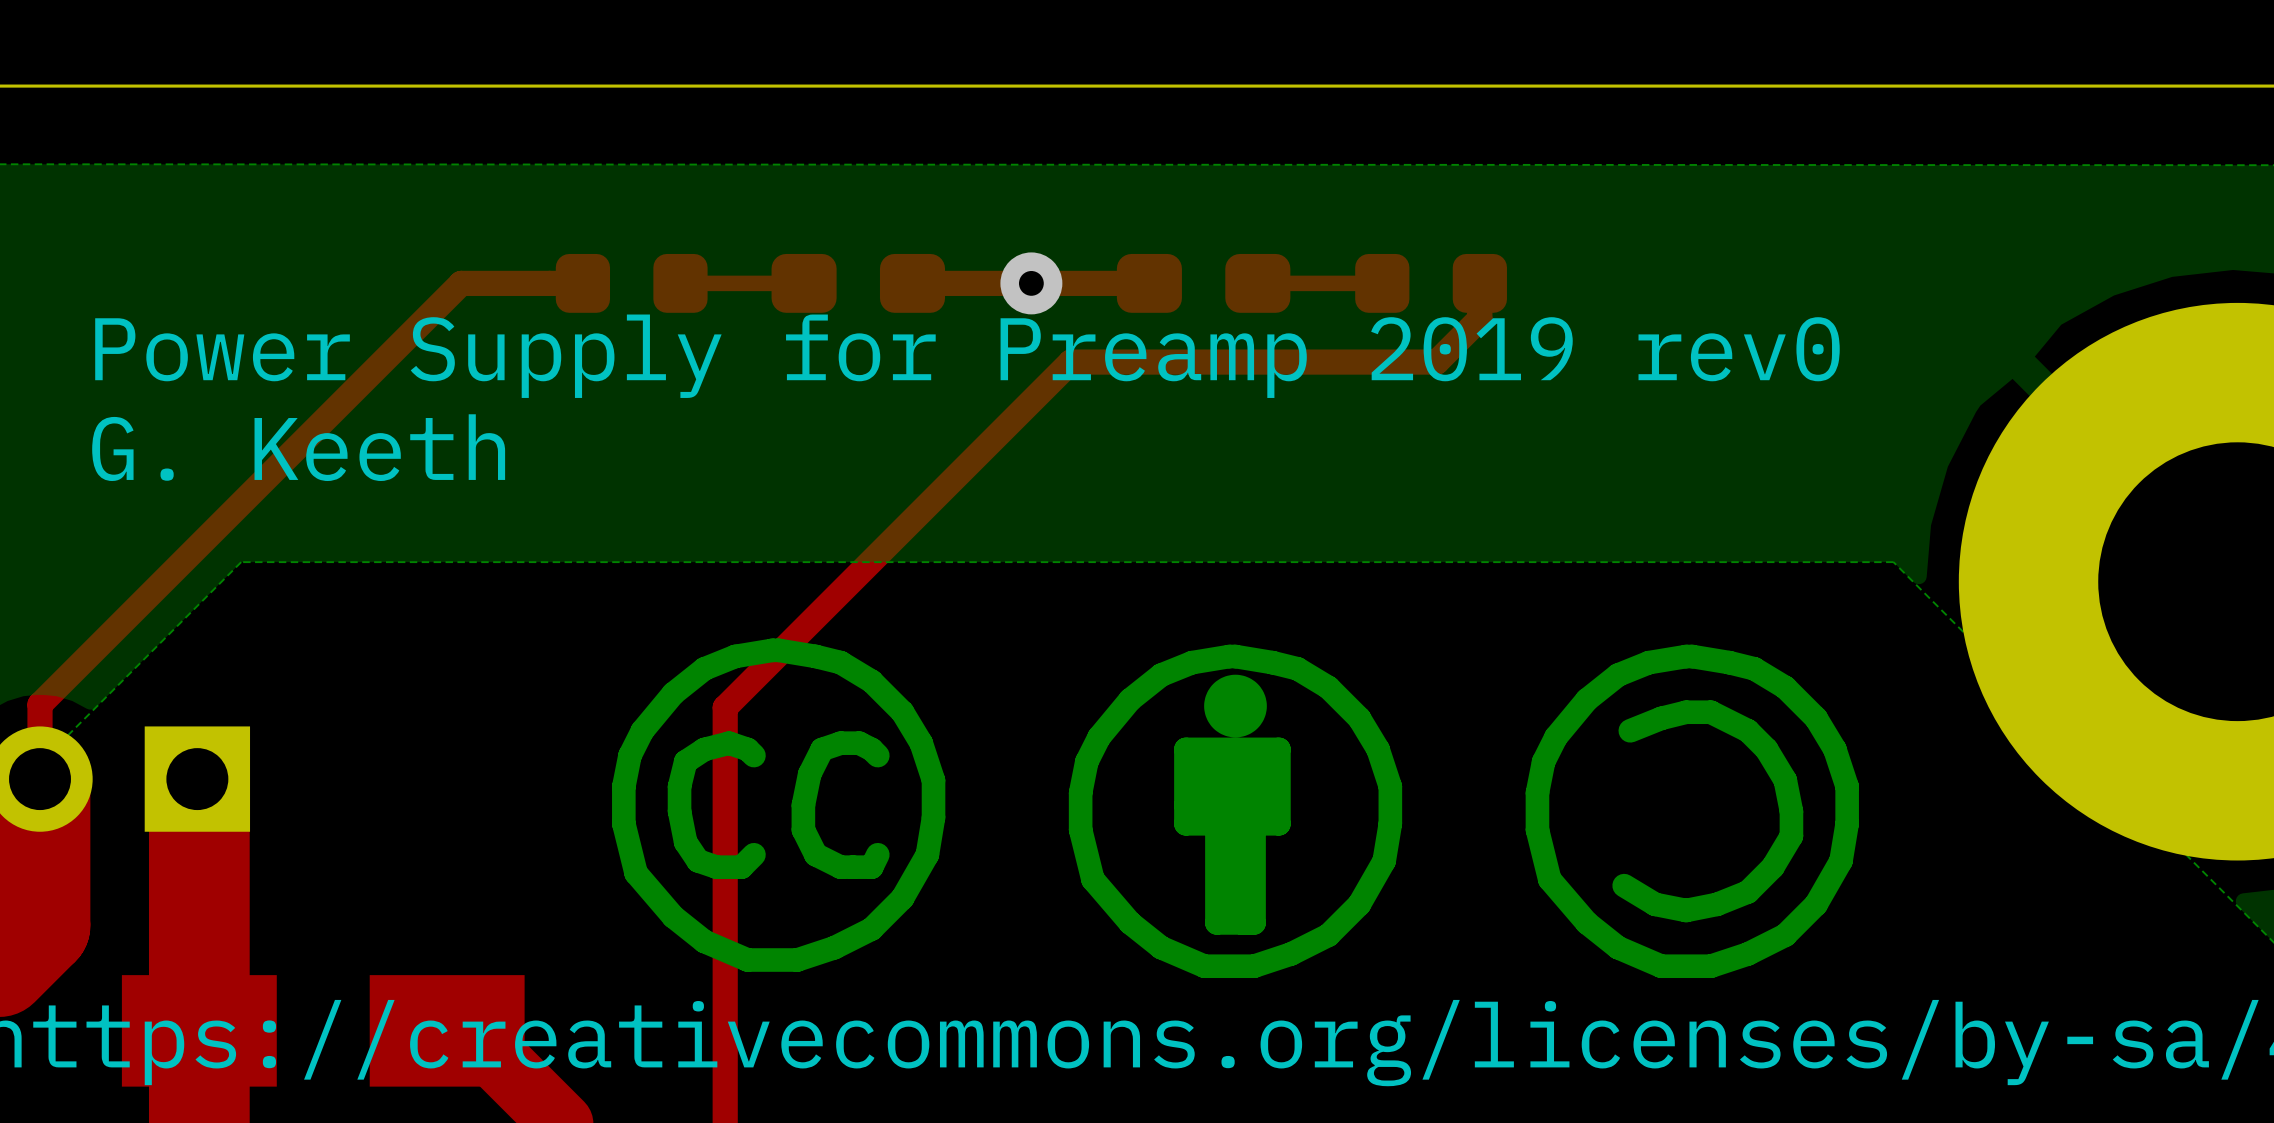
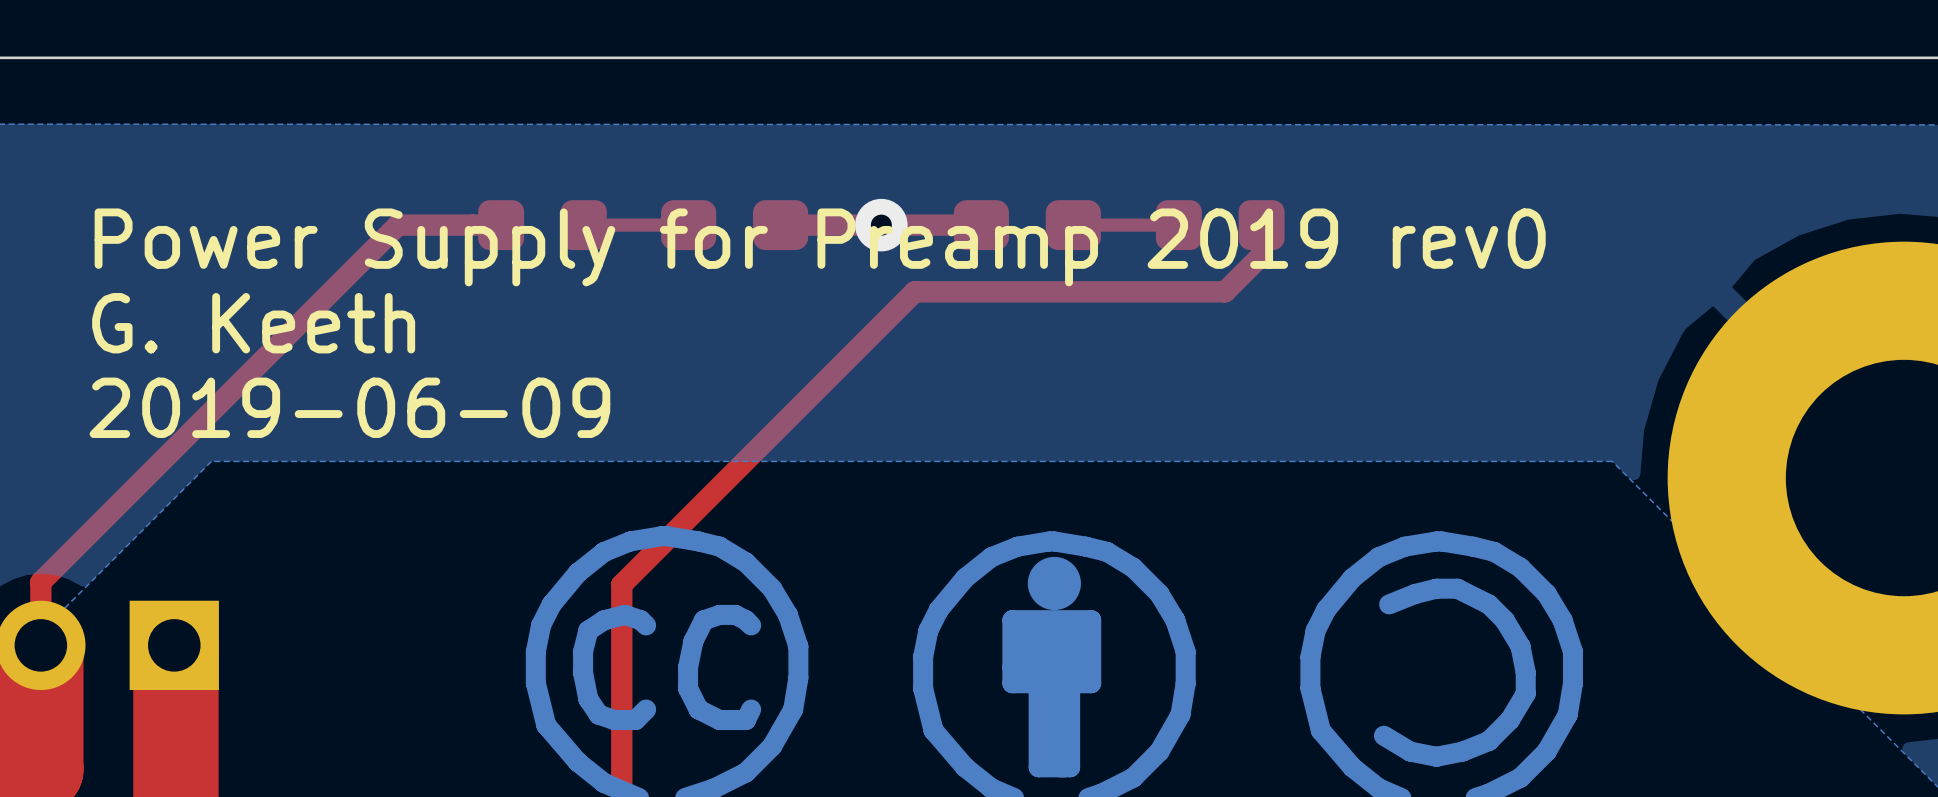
text position: Power Supply for Preamp 2019 rev0 (967, 356) -> Power Supply for Preamp 2019 rev0 (820, 247)
text position: G. Keeth (298, 447) -> G. Keeth (253, 323)
text: none -> 2019-06-09 (349, 407)

